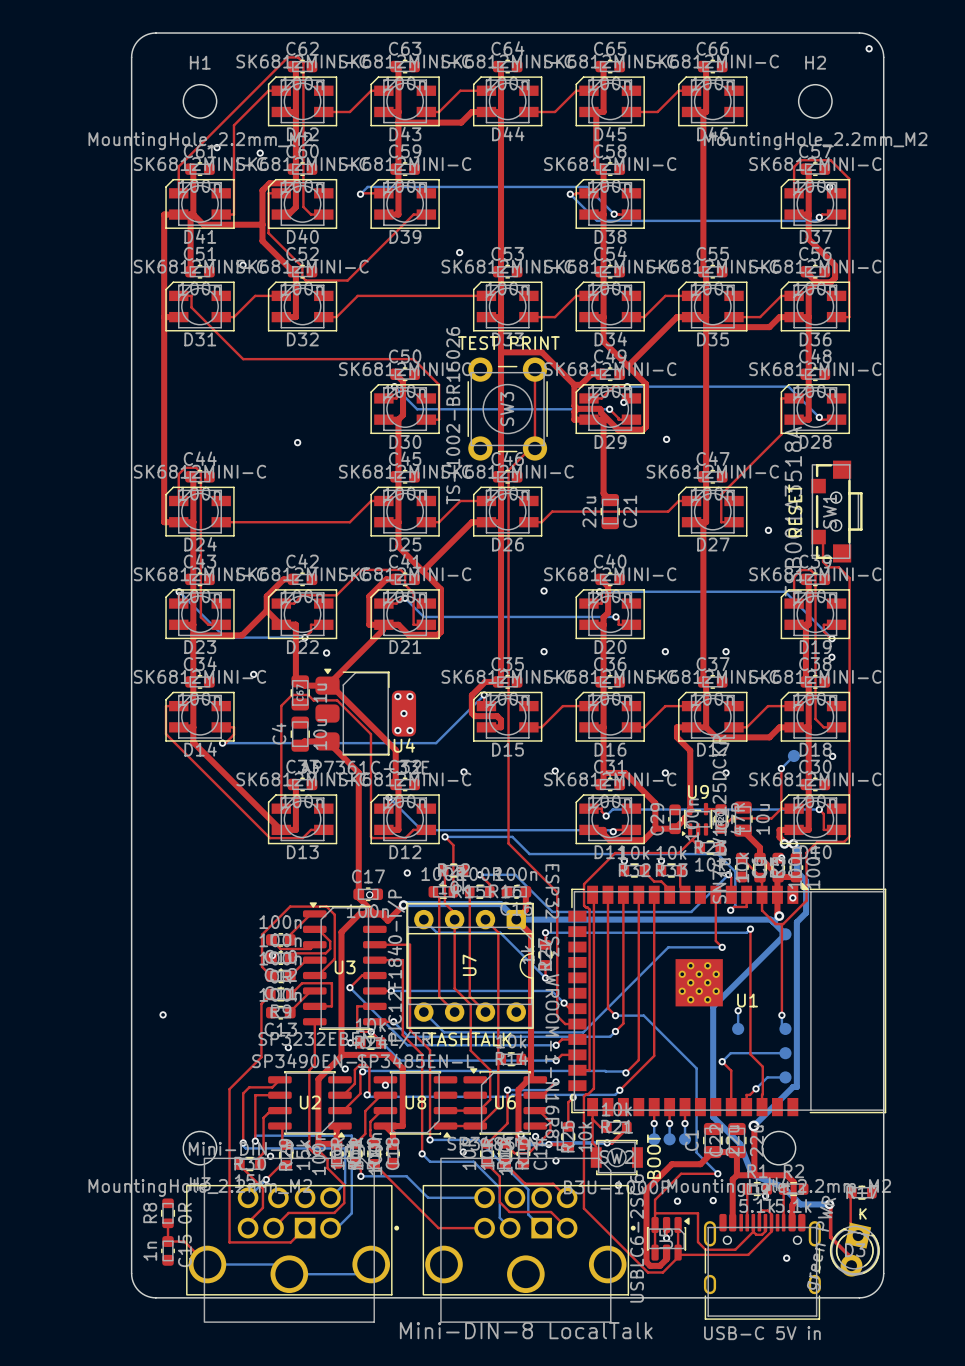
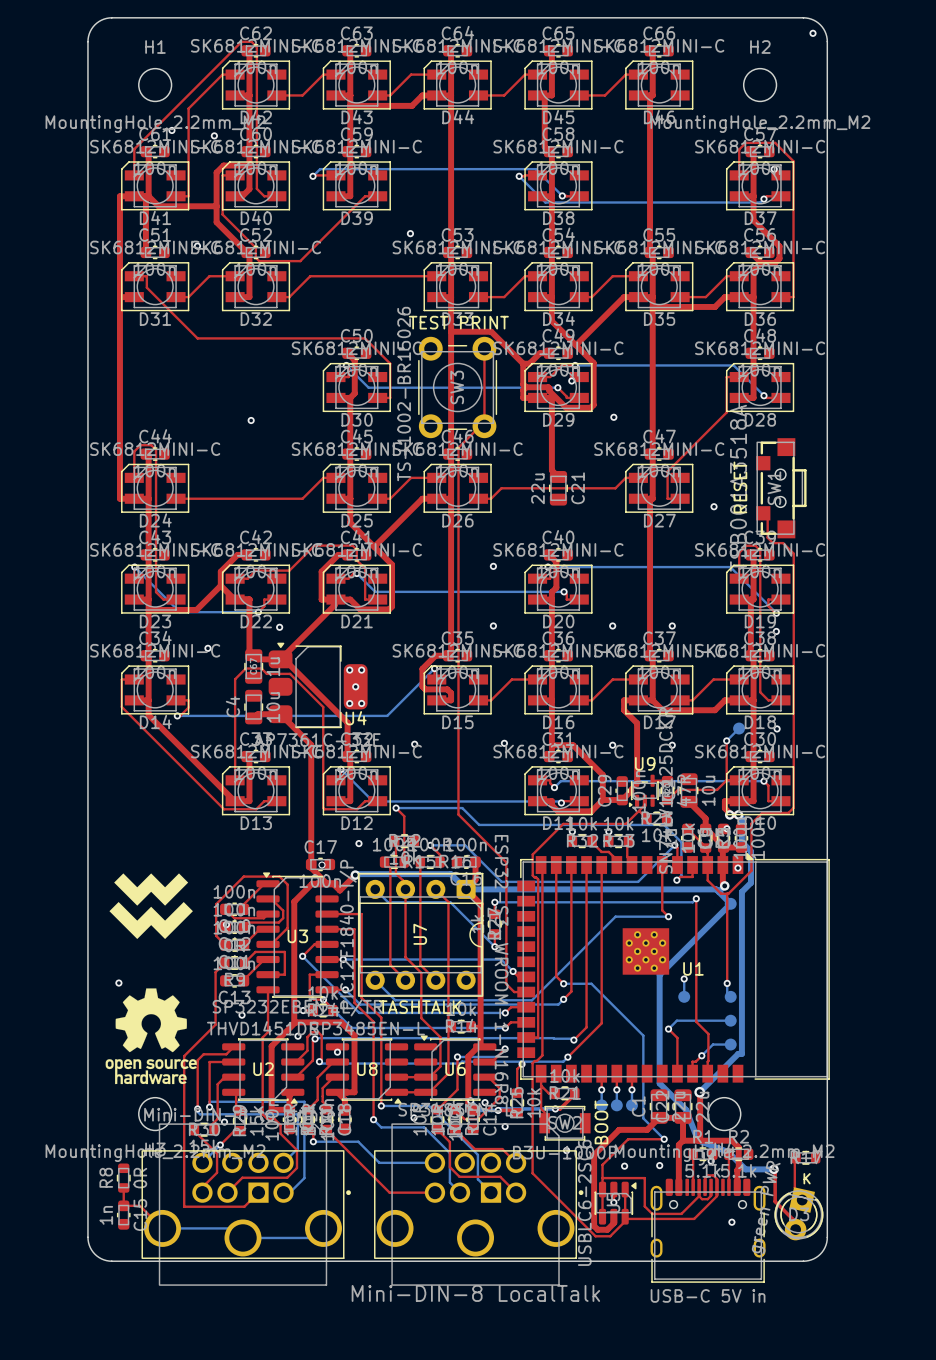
drawing: none -> [109, 873, 193, 940]
drawing: none -> [105, 988, 197, 1085]
U2 value: SP3490EN-L (310, 1060) -> THVD1451DR (262, 1028)

